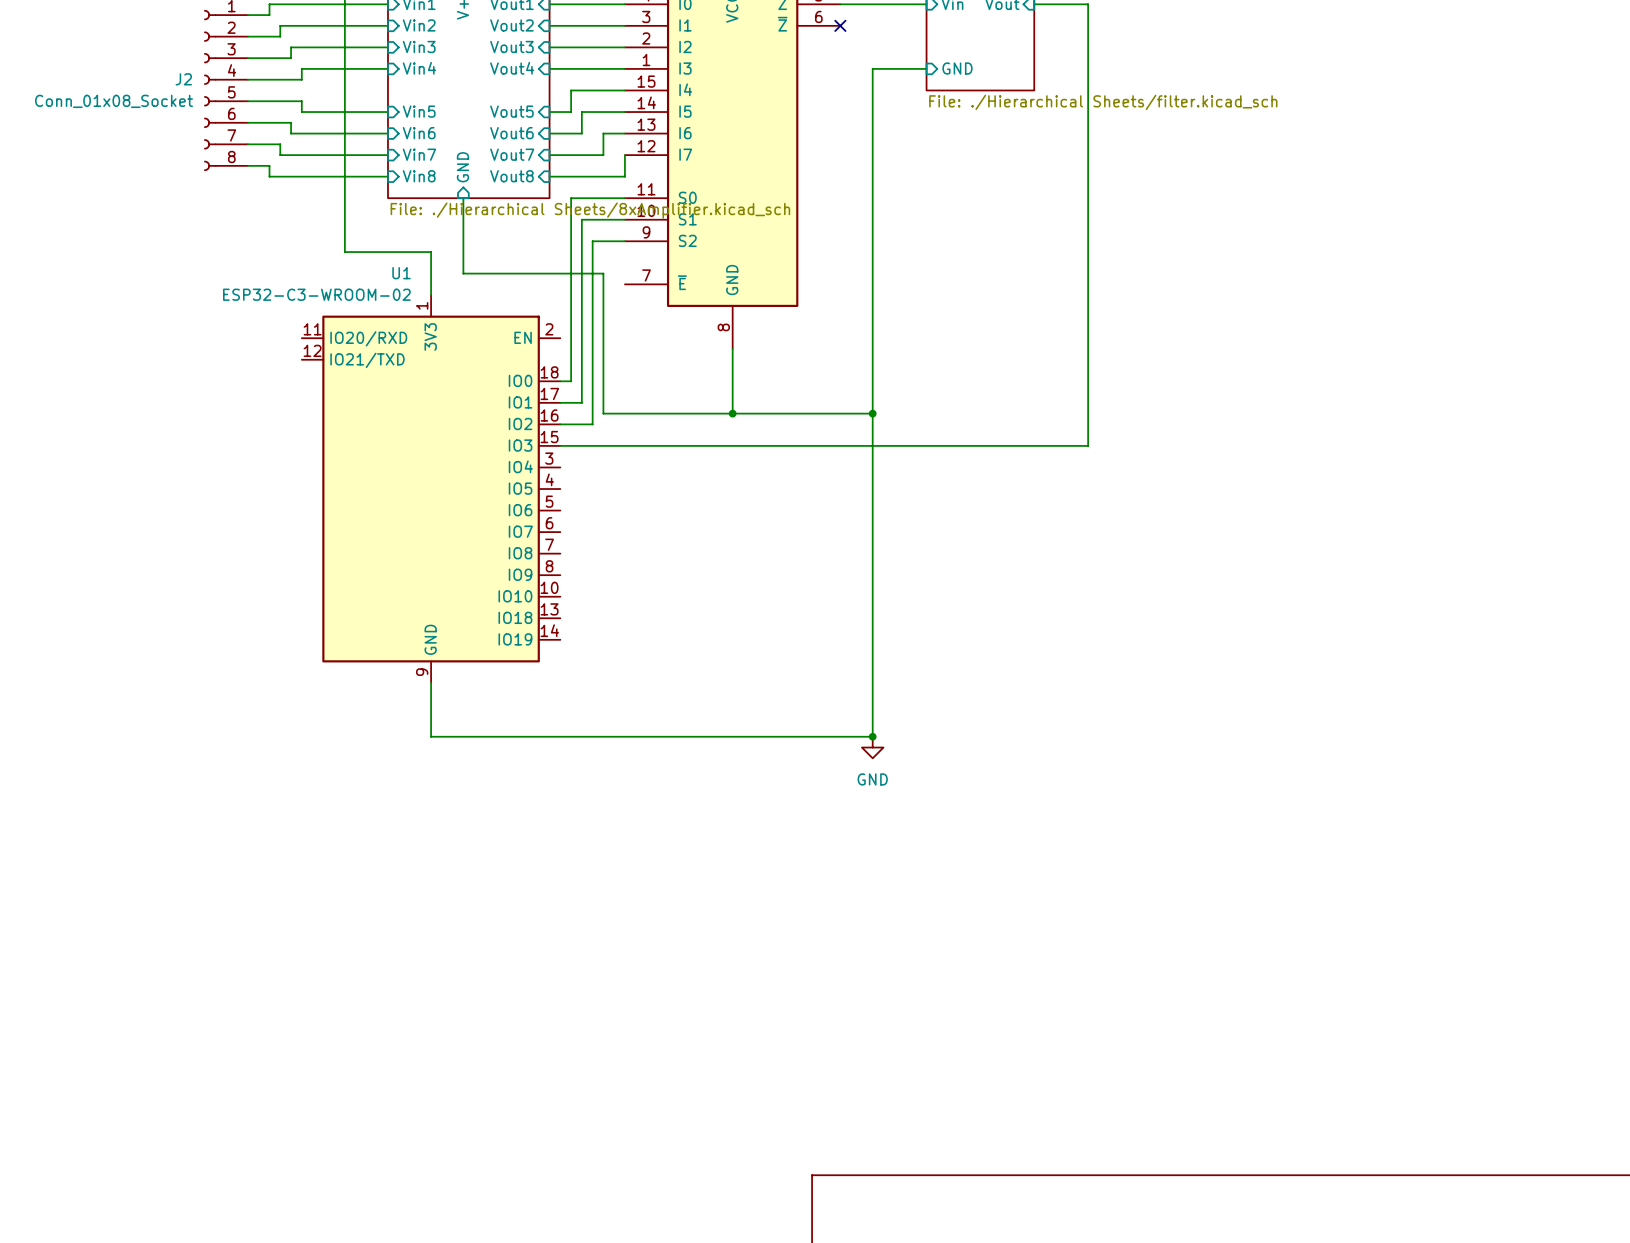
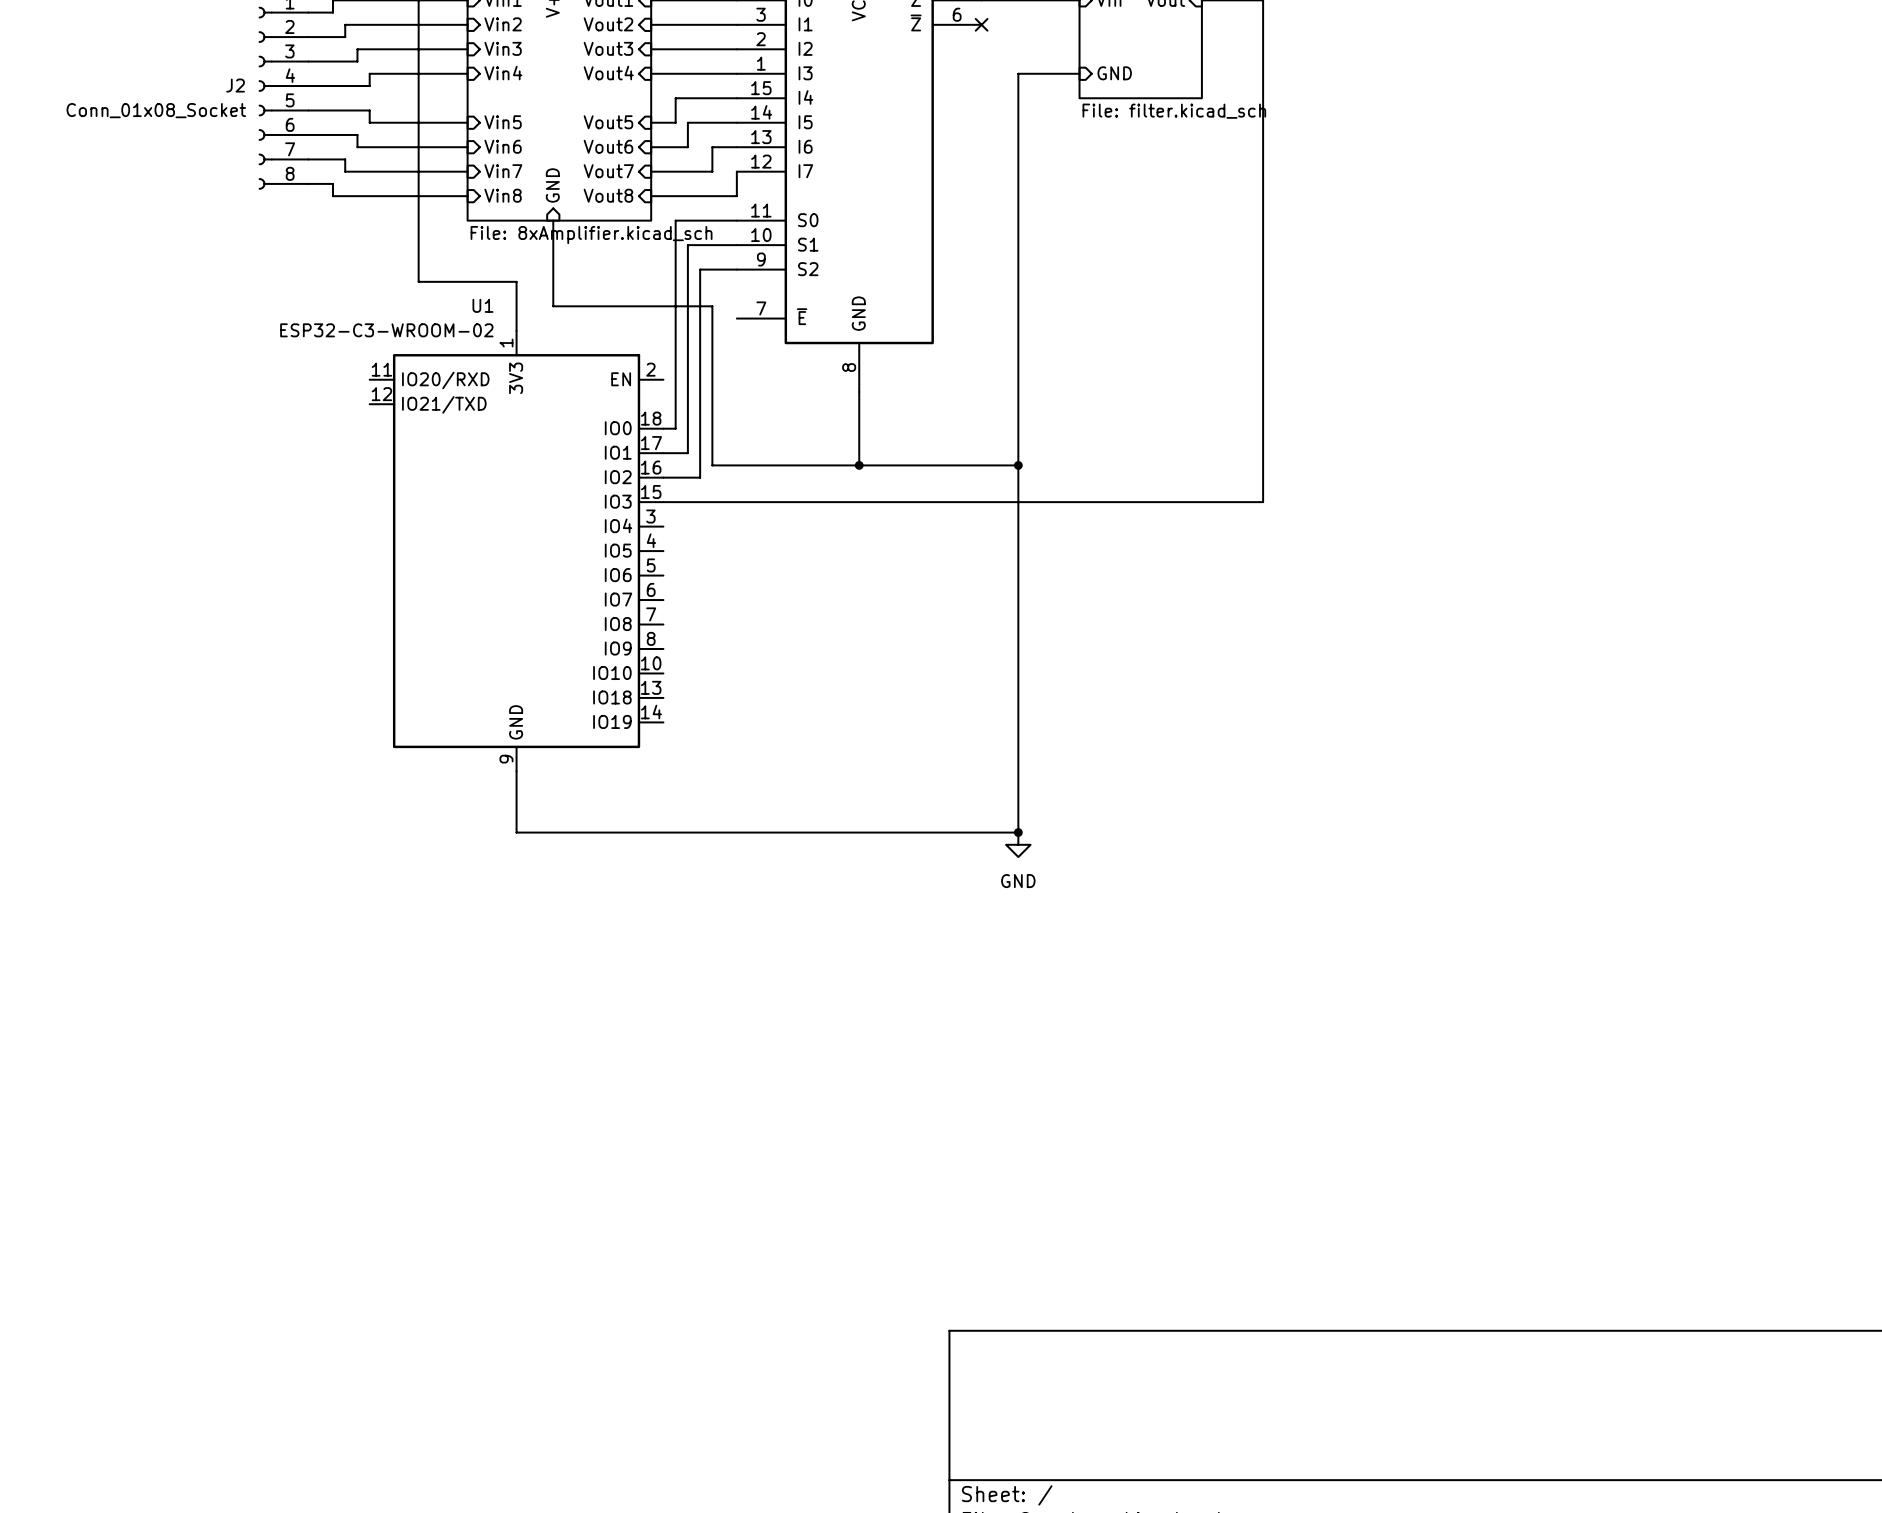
sheet value: File: ./Hierarchical Sheets/filter.kicad_sch (1103, 102) -> File: filter.kicad_sch (1174, 111)
sheet value: File: ./Hierarchical Sheets/8xAmplifier.kicad_sch (590, 210) -> File: 8xAmplifier.kicad_sch (591, 235)

